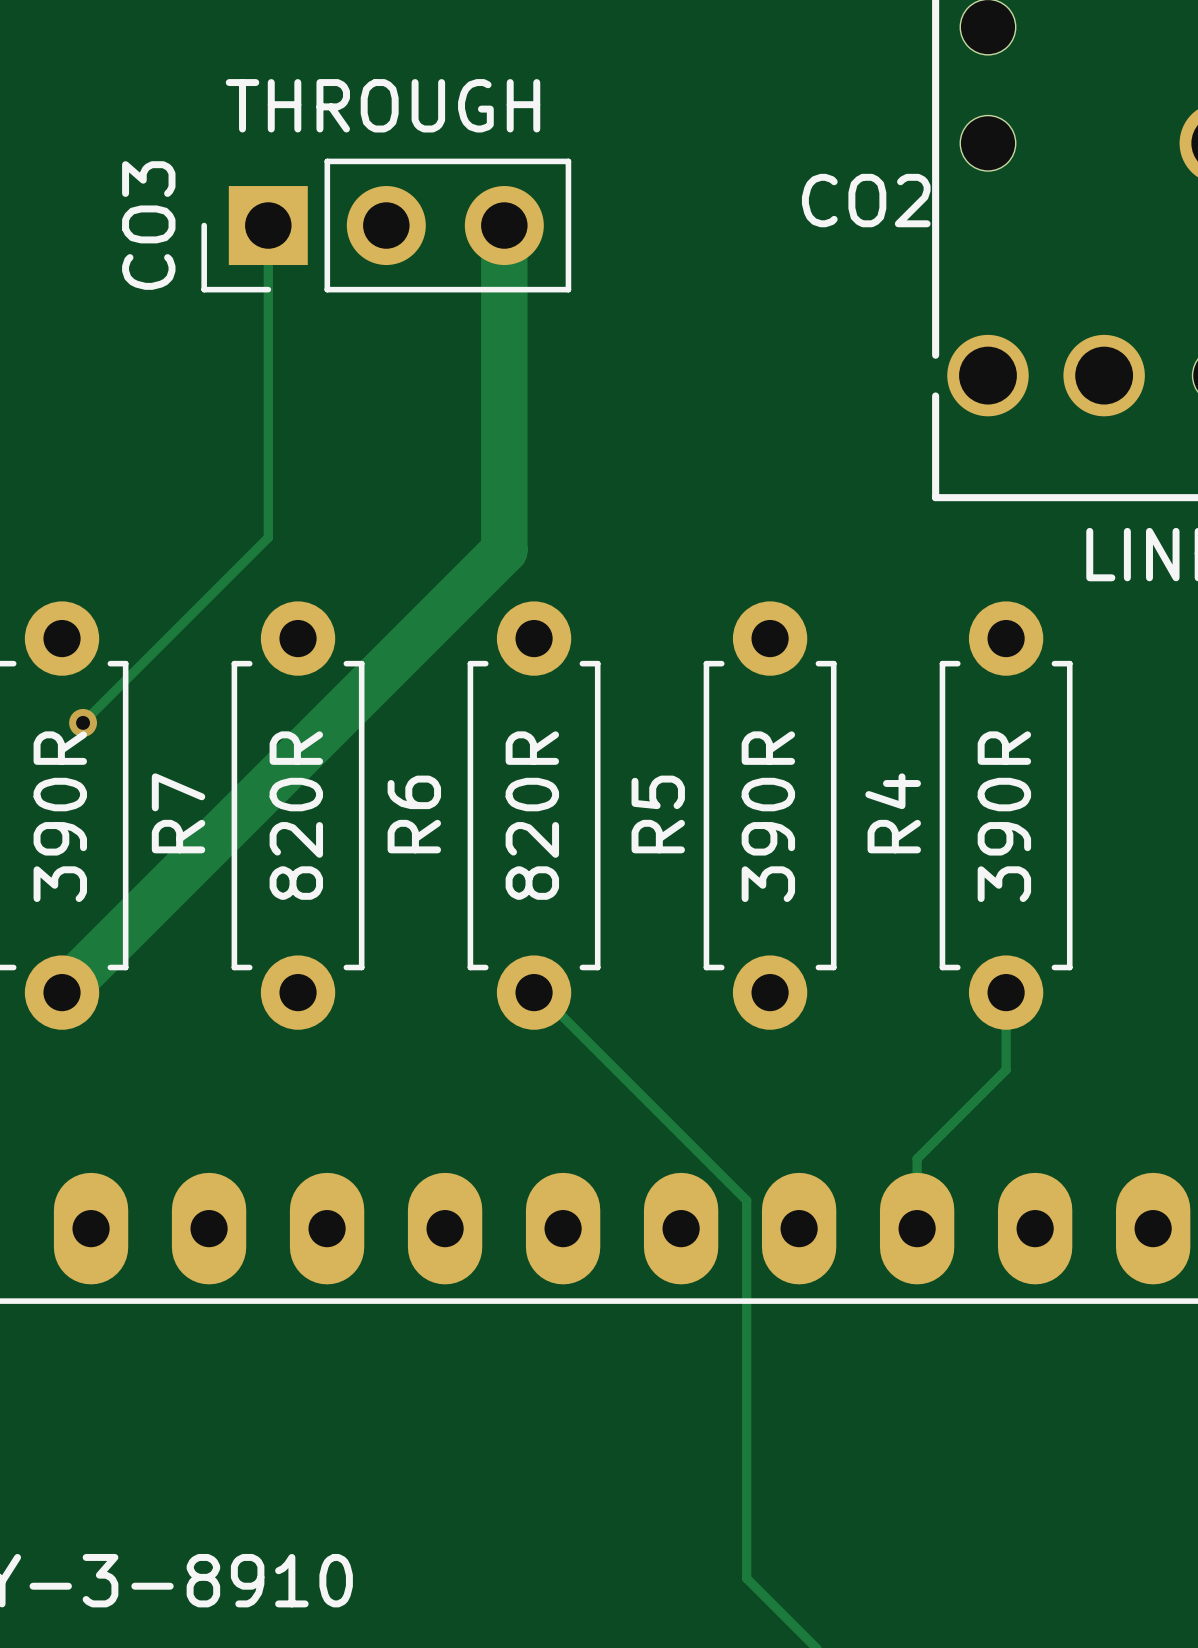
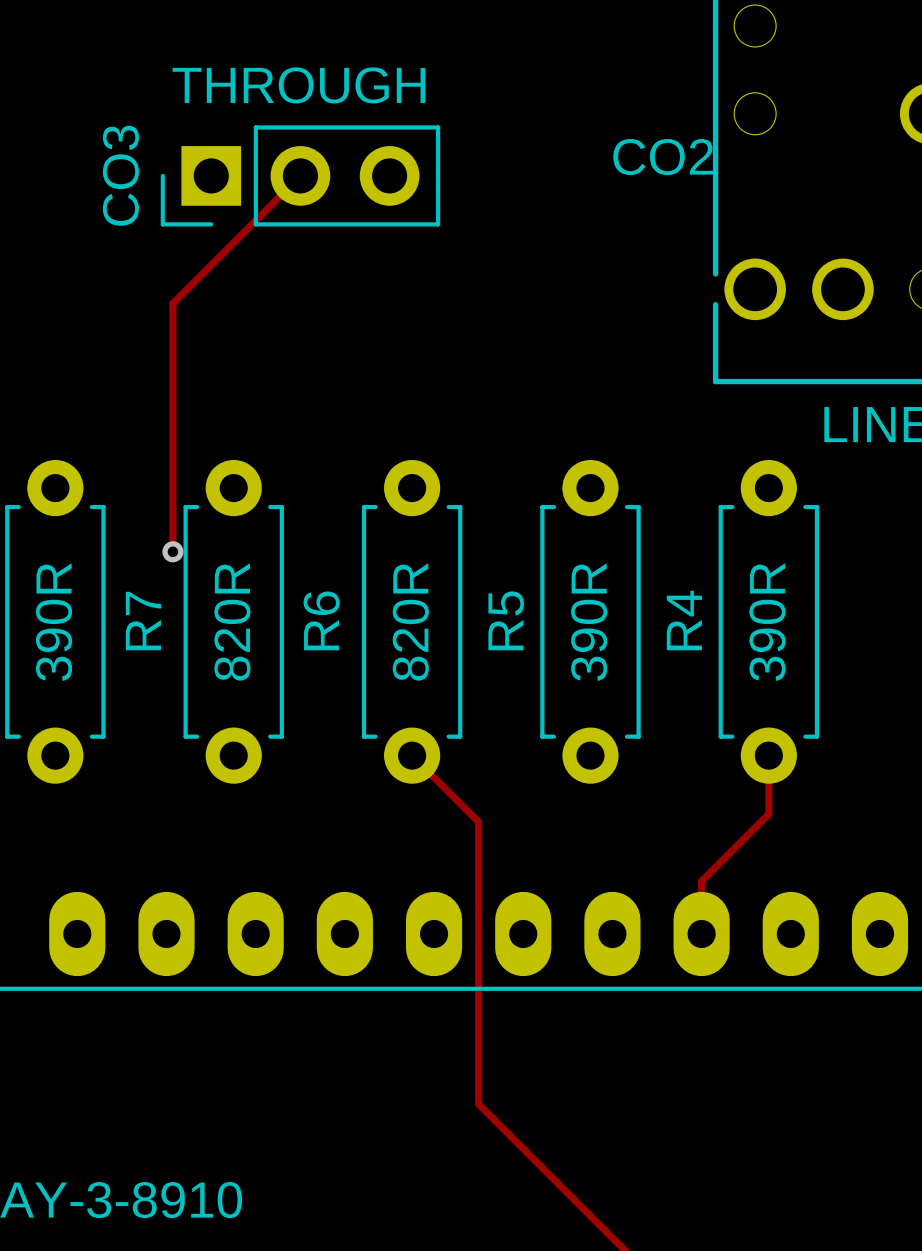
track: (268, 225) (268, 537) (83, 722) -> none
track: none -> (300, 175) (172, 303) (172, 551)
track: (504, 225) (504, 550) (62, 992) -> none
via position: (83, 722) -> (172, 551)
track: (534, 992) (538, 992) (746, 1200) (746, 1578) -> (412, 755) (478, 822) (478, 1104) (572, 1198)

